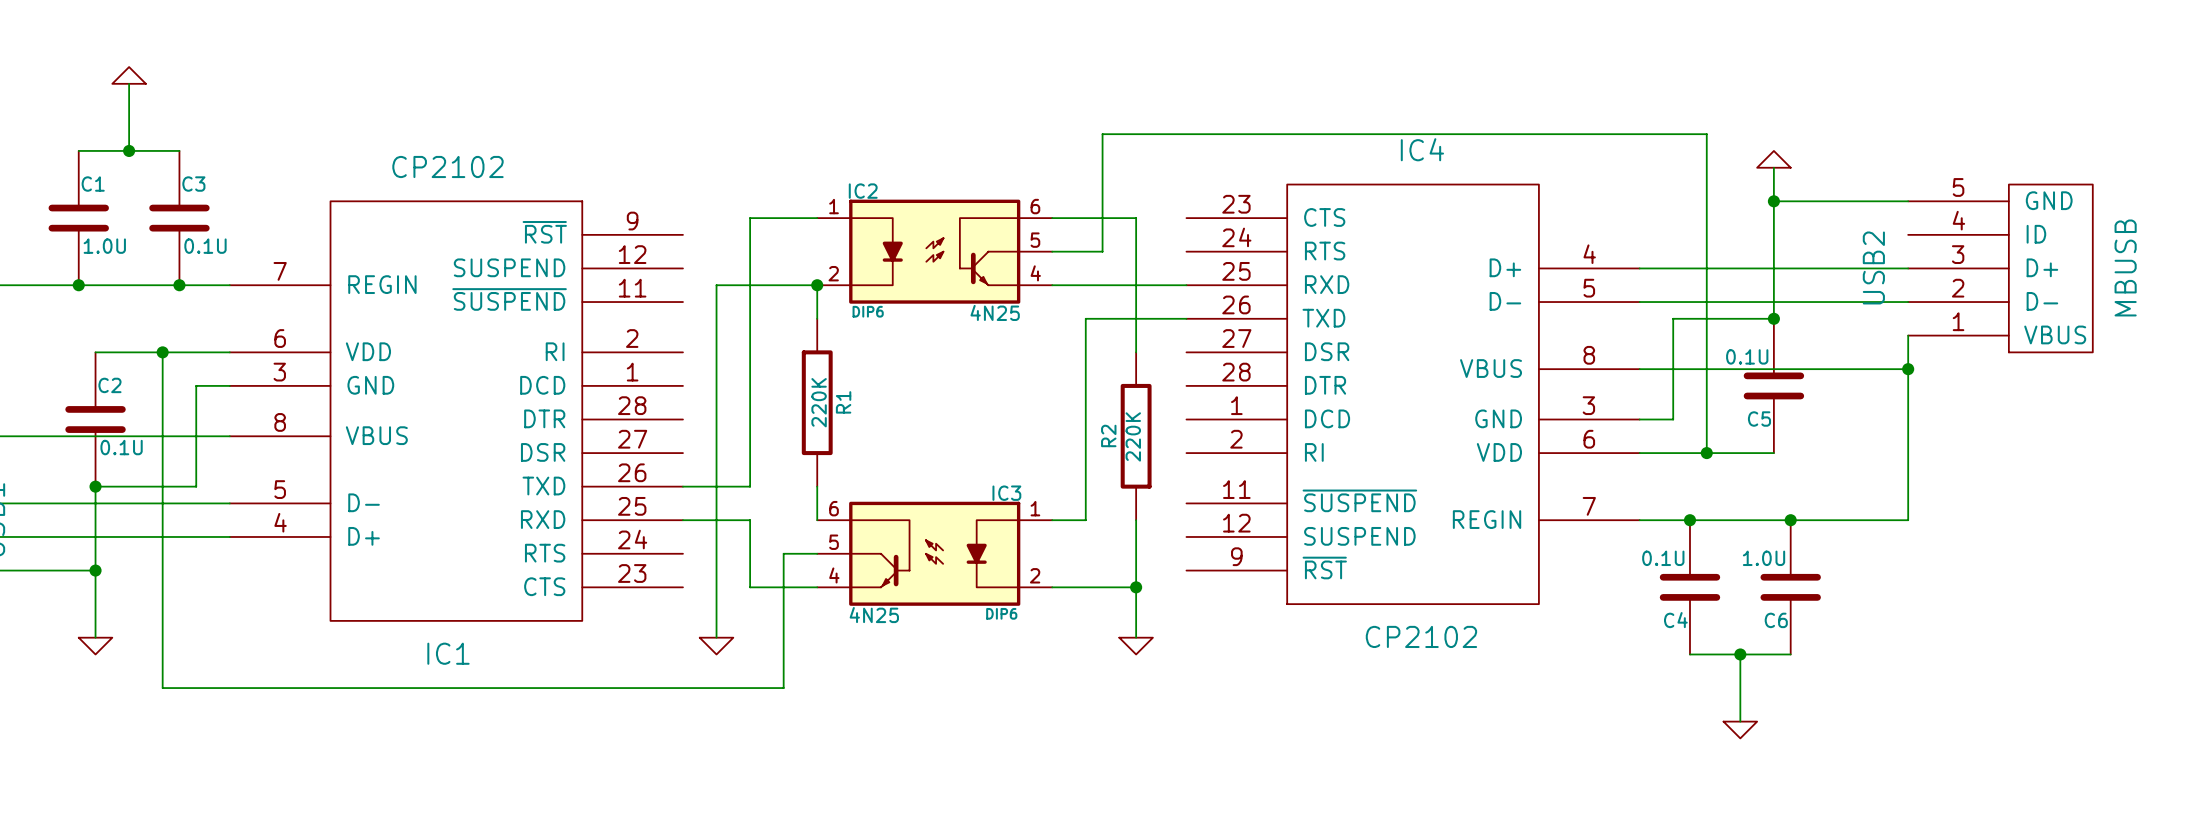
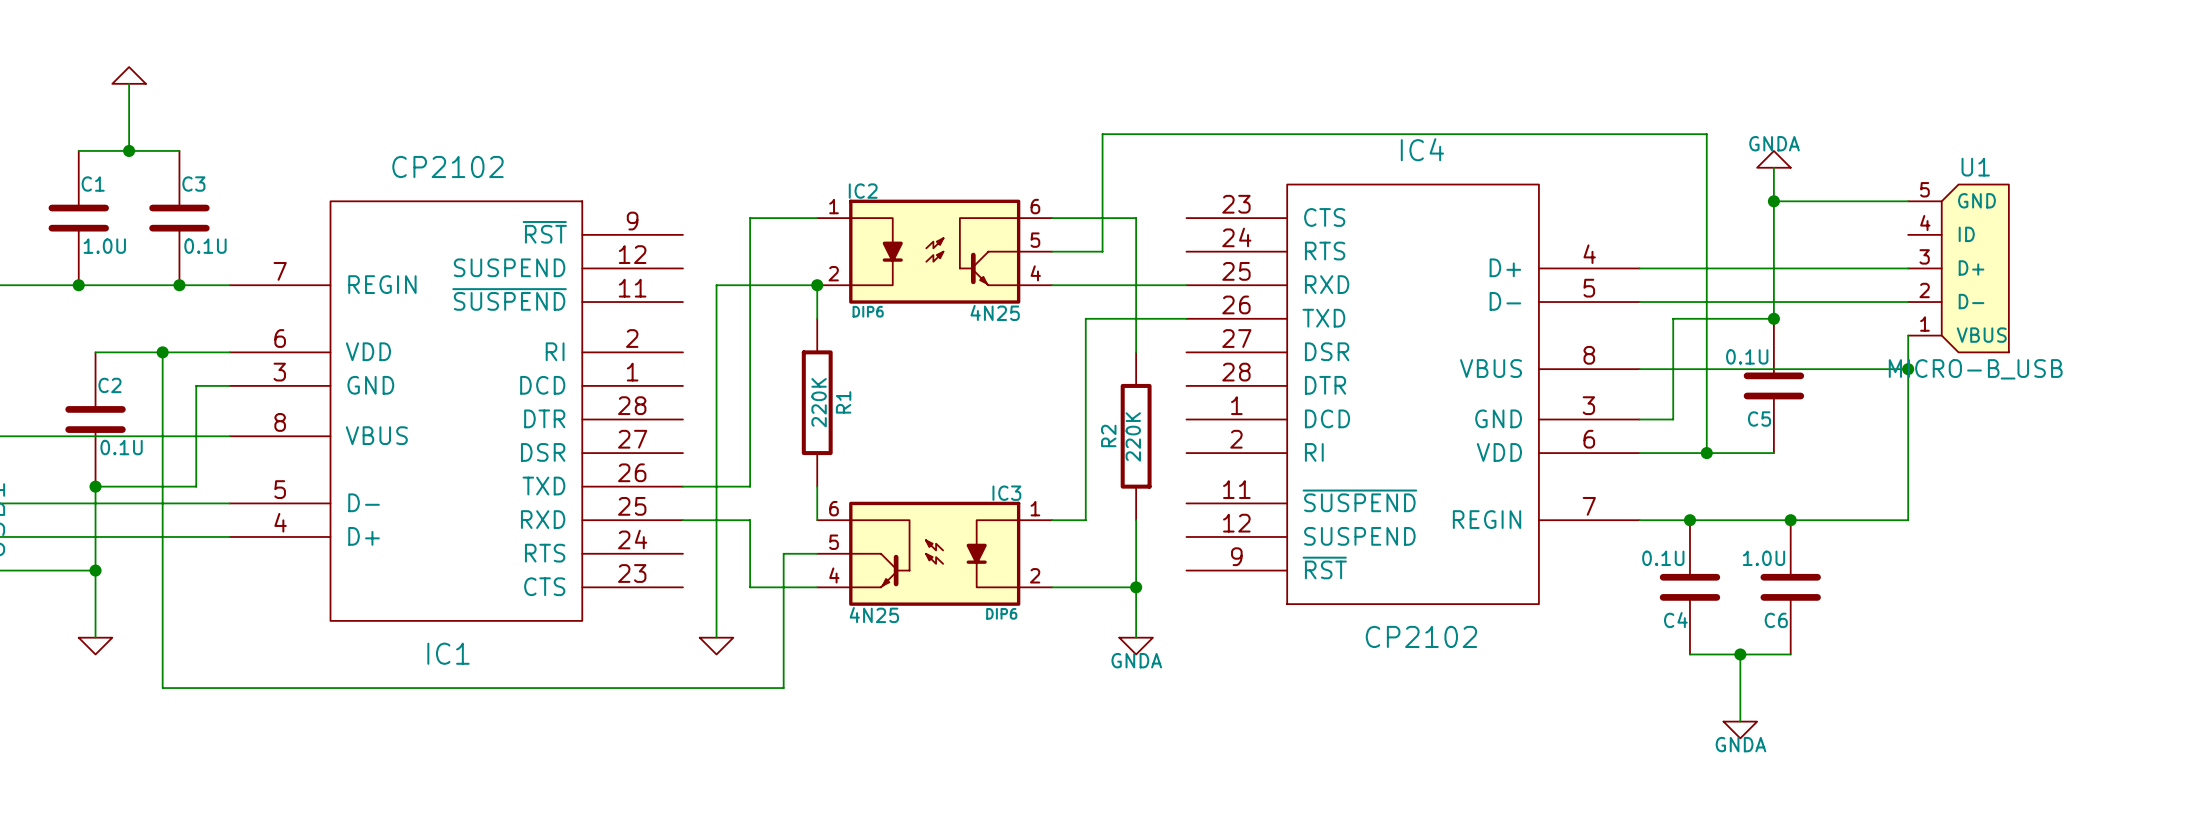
power symbol text: none -> GNDA (1774, 143)
U1: none -> MICRO-B_USB (1958, 268)
USB2: MBUSB (2000, 268) -> none
power symbol text: none -> GNDA (1136, 660)
power symbol text: none -> GNDA (1740, 744)

